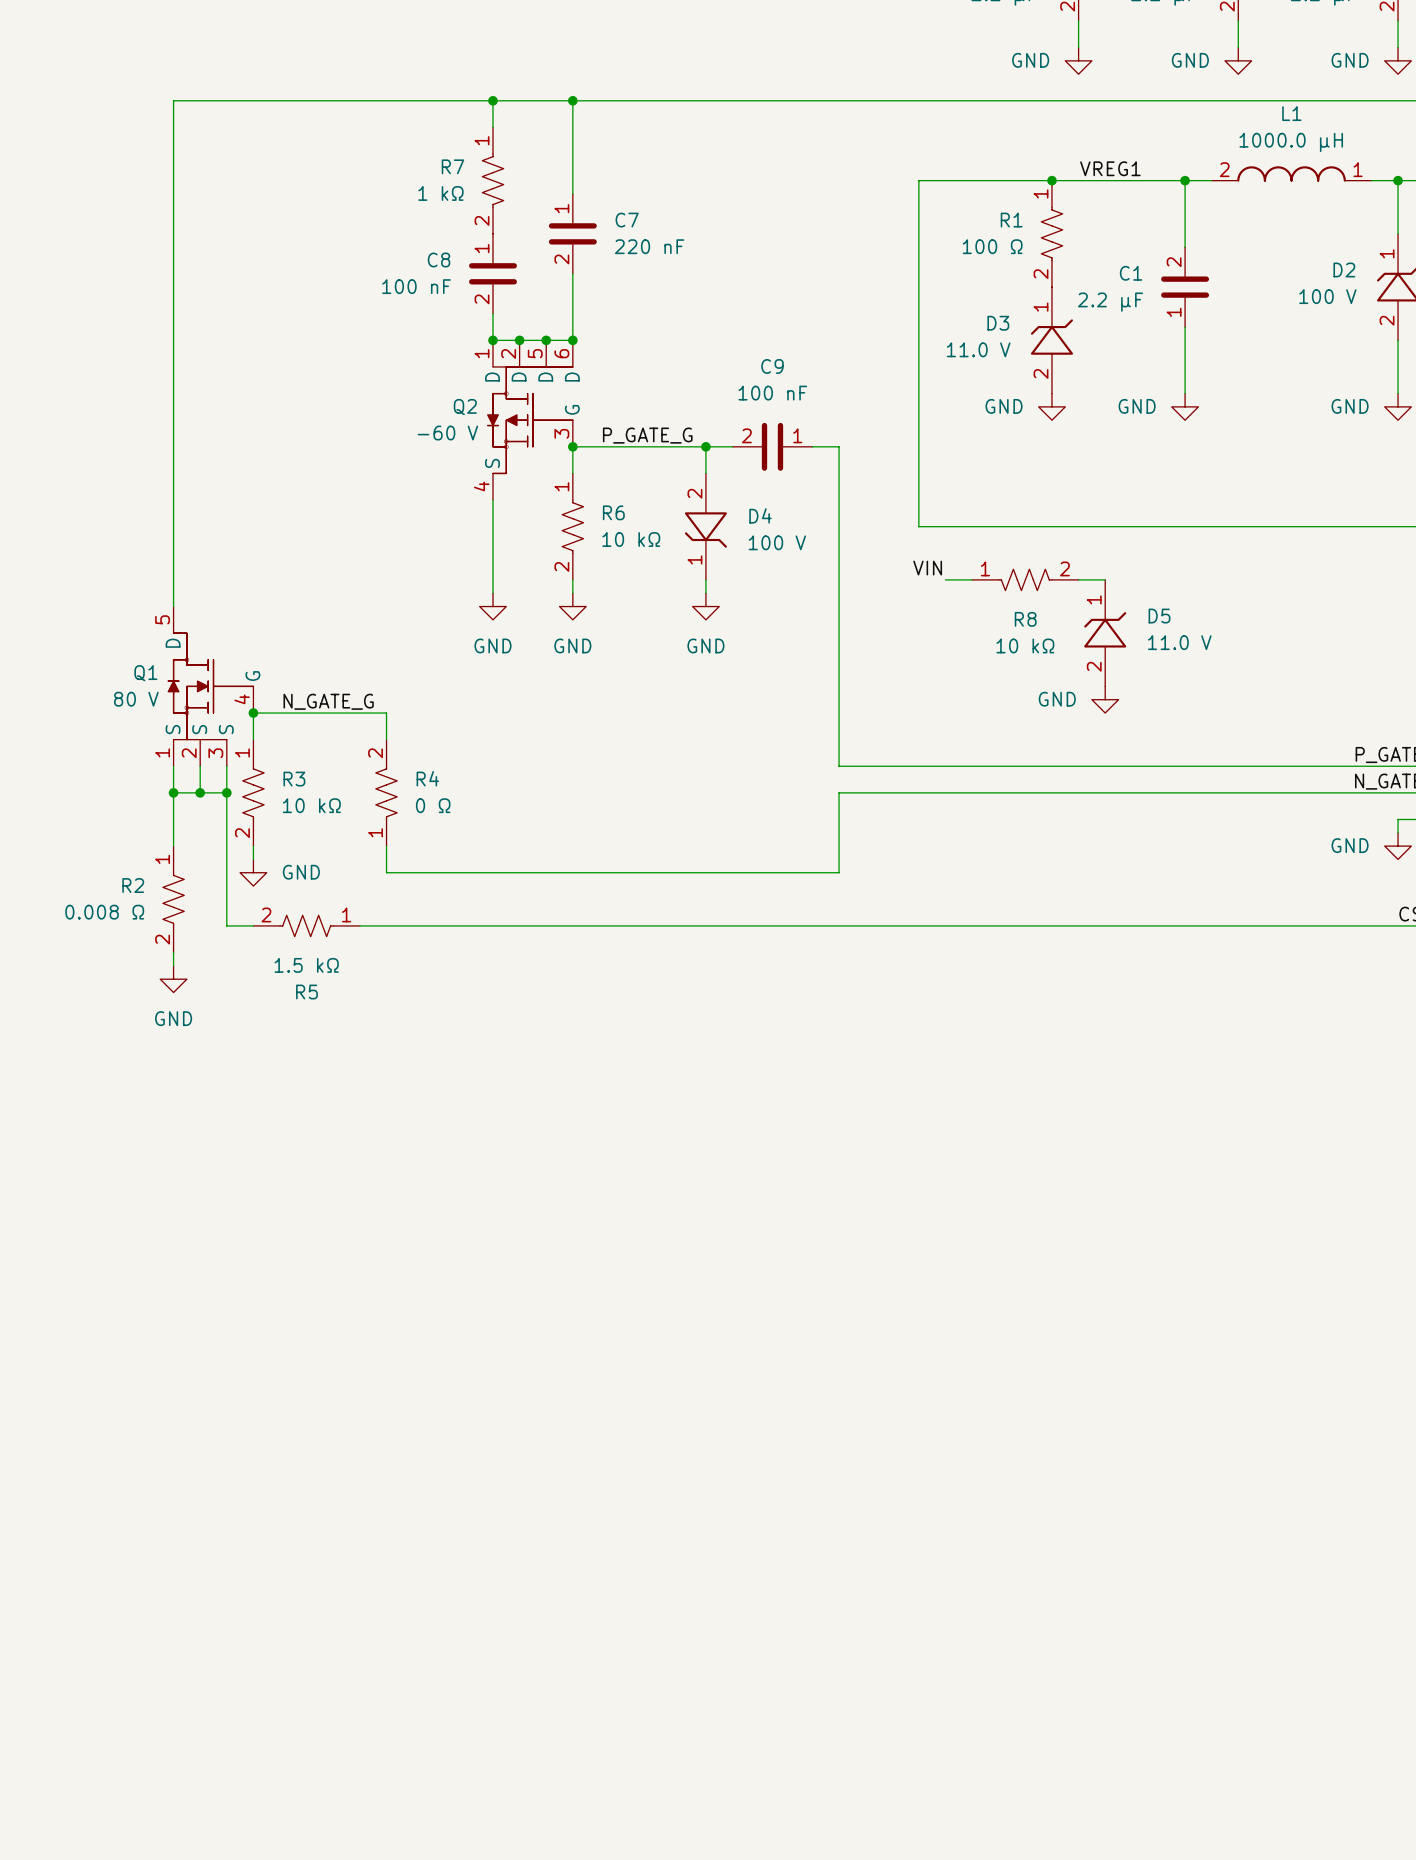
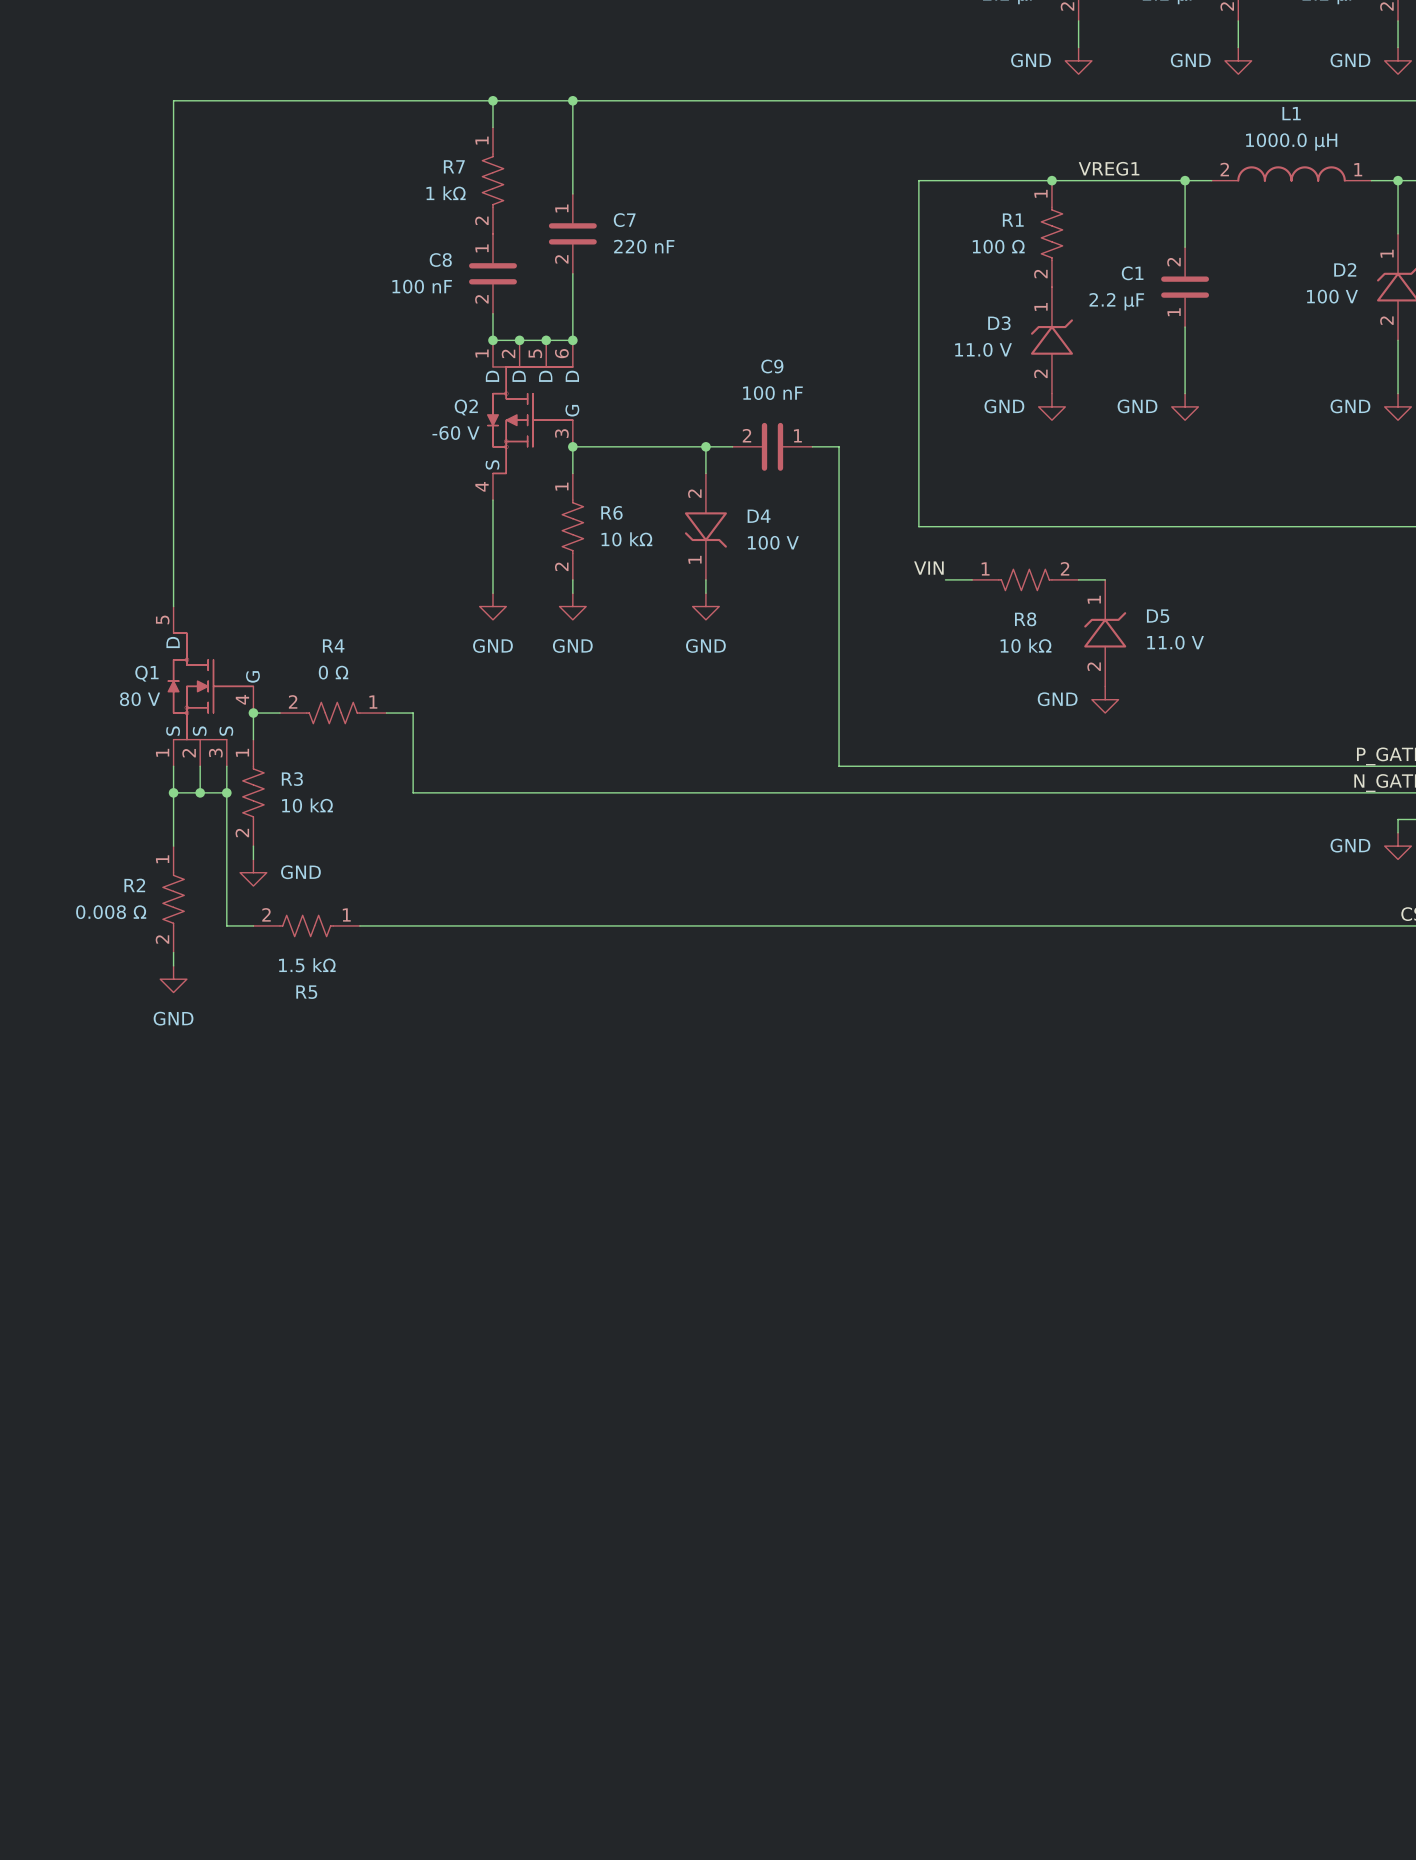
label: P_GATE_G (647, 435) -> none
label: N_GATE_G (328, 701) -> none
wire: (280, 713) (386, 713) (386, 739) -> none
R4 name position: R4 (427, 778) -> R4 (333, 645)
R4 rotation: 0° (386, 792) -> 90° counterclockwise (333, 713)
R4 position: (386, 792) -> (333, 713)
wire: (839, 792) (839, 872) (386, 872) (386, 846) -> (839, 792) (413, 792) (413, 713) (386, 713)

